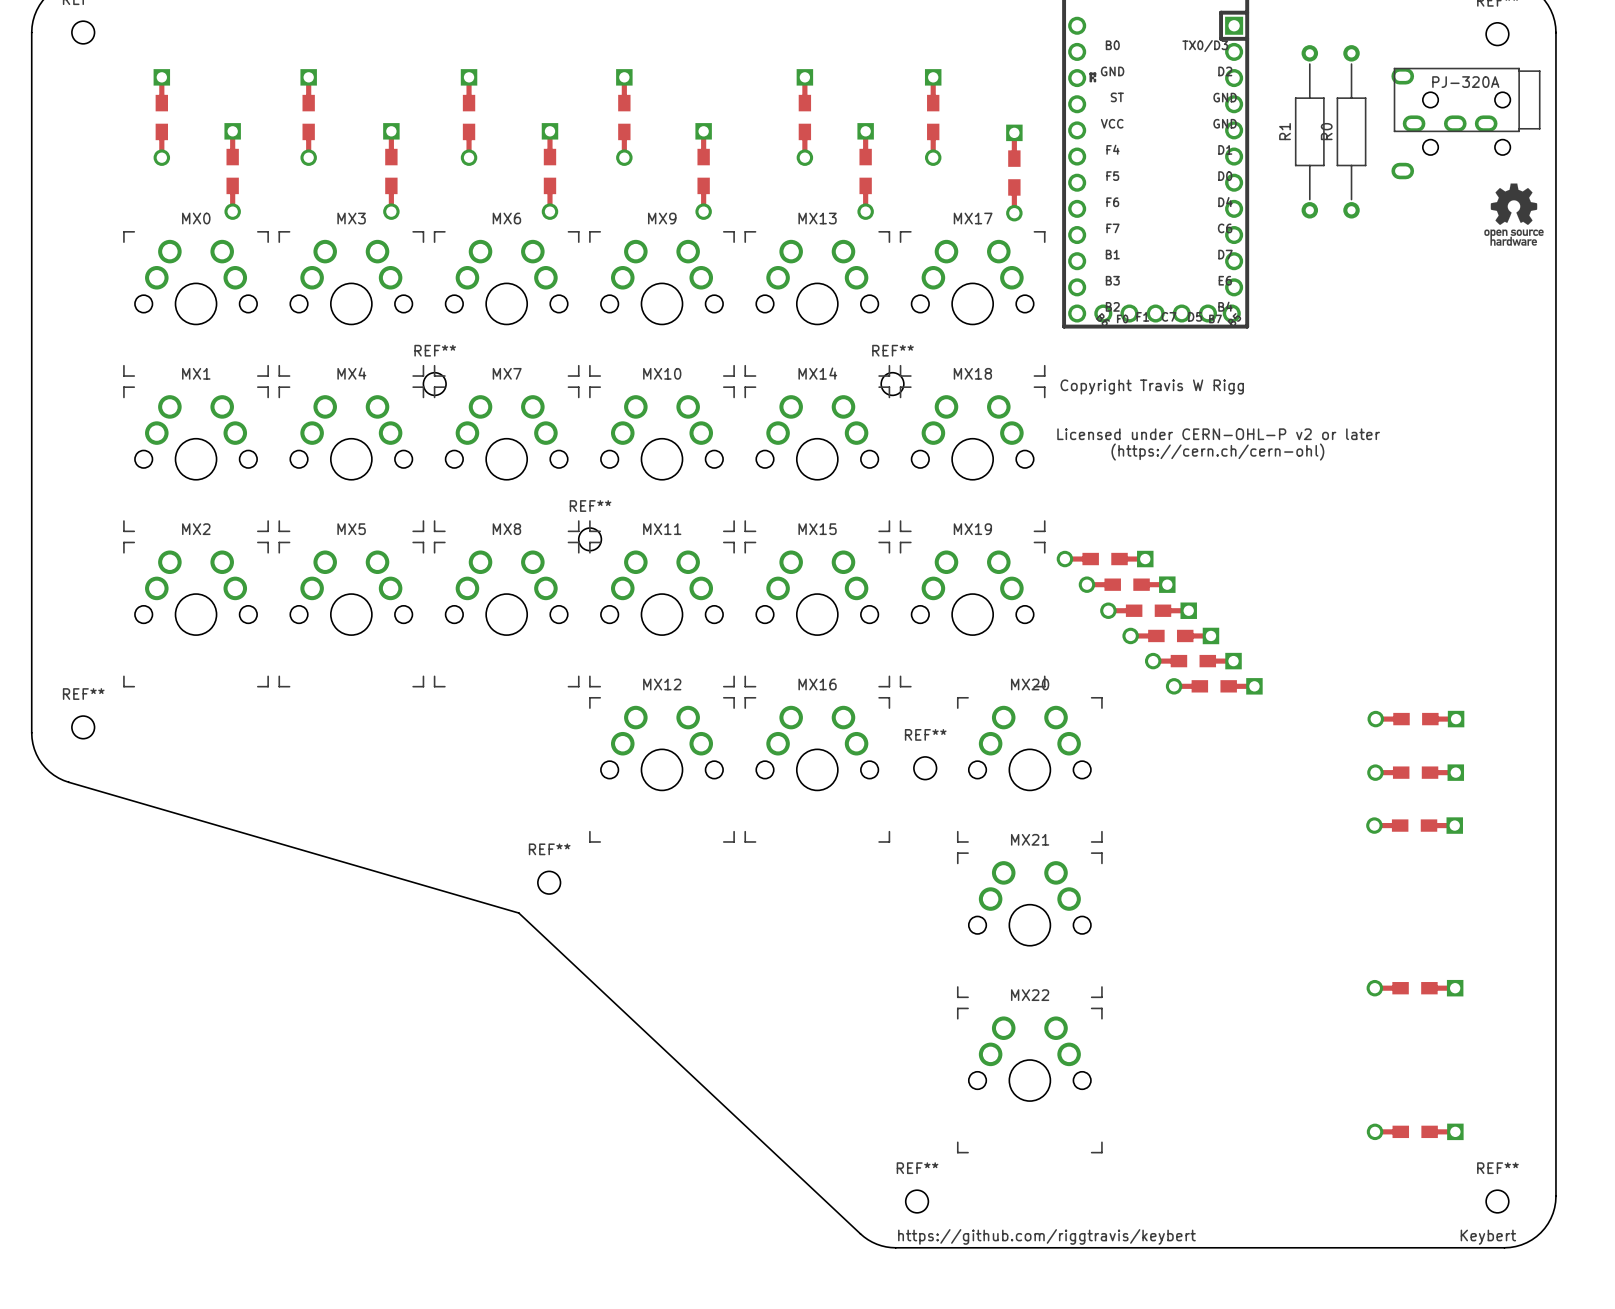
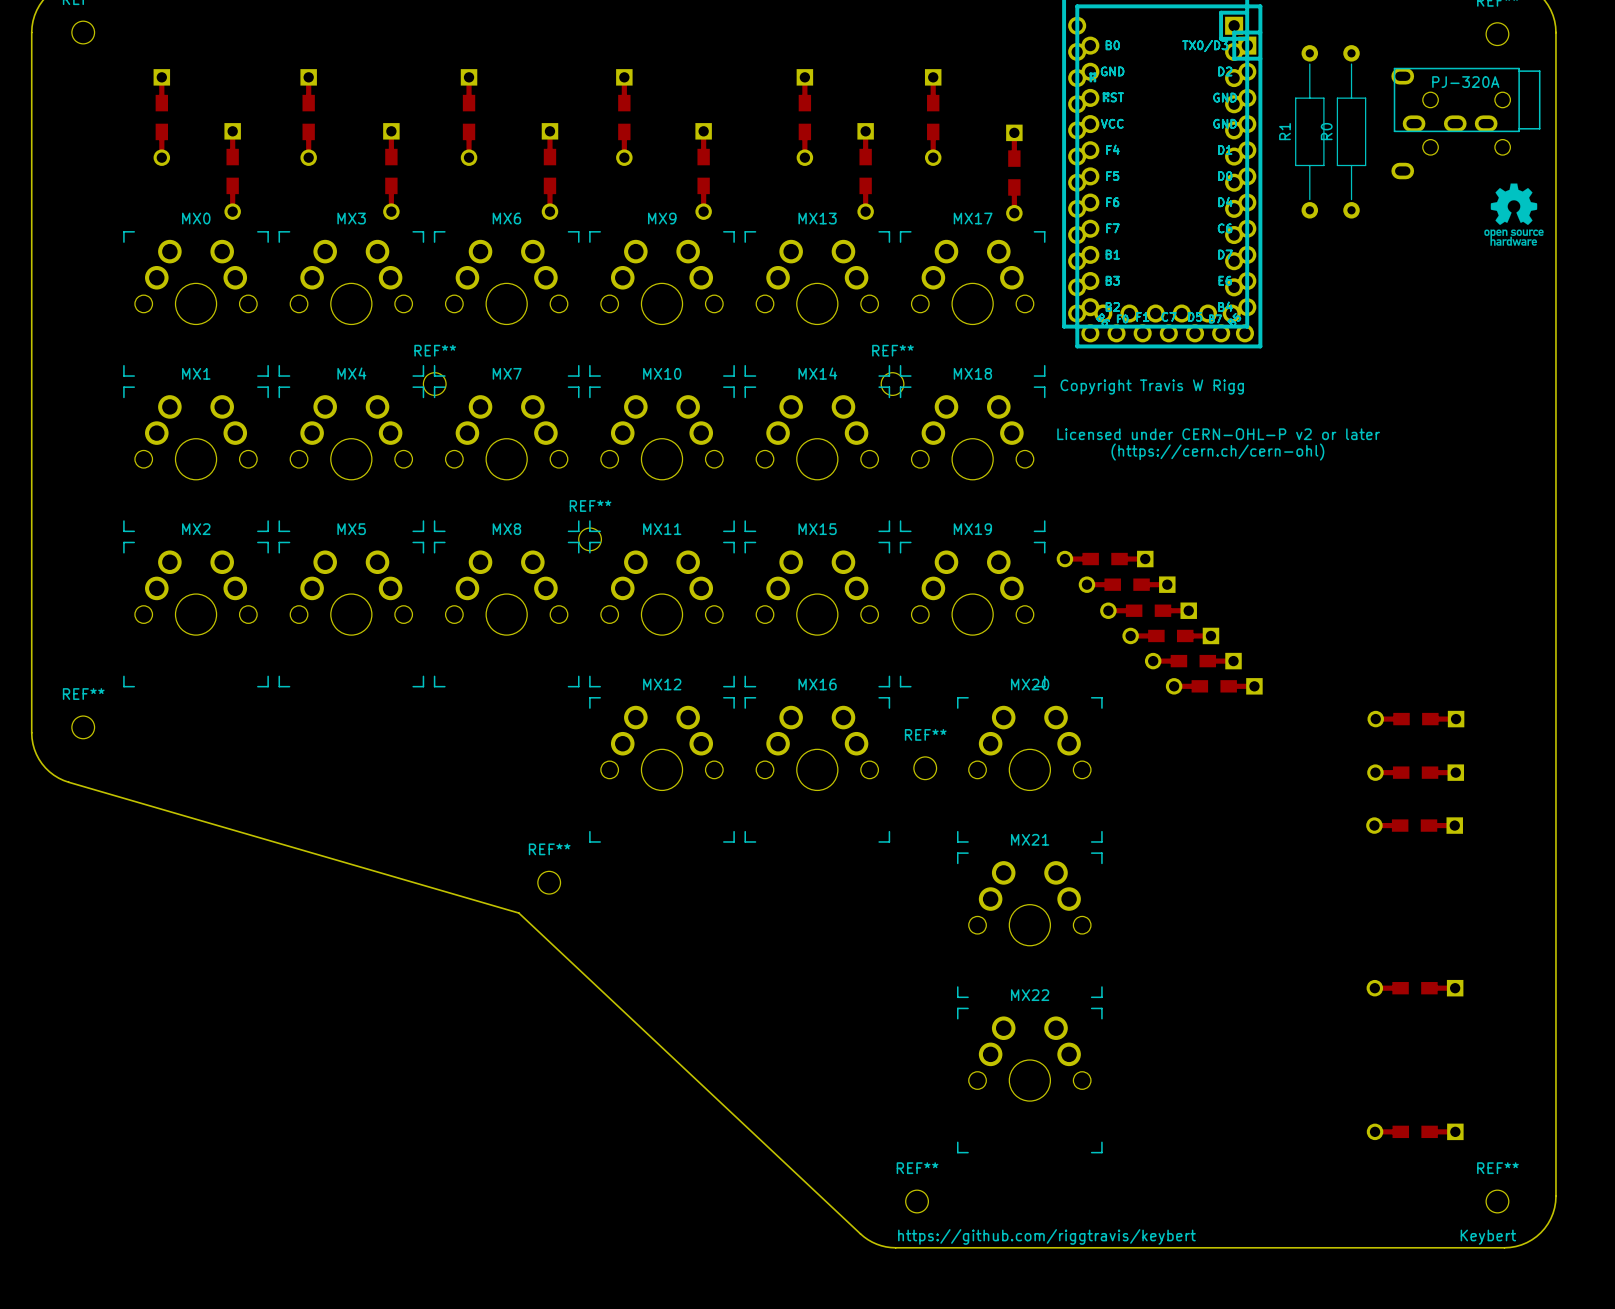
part: none -> (1168, 176)

